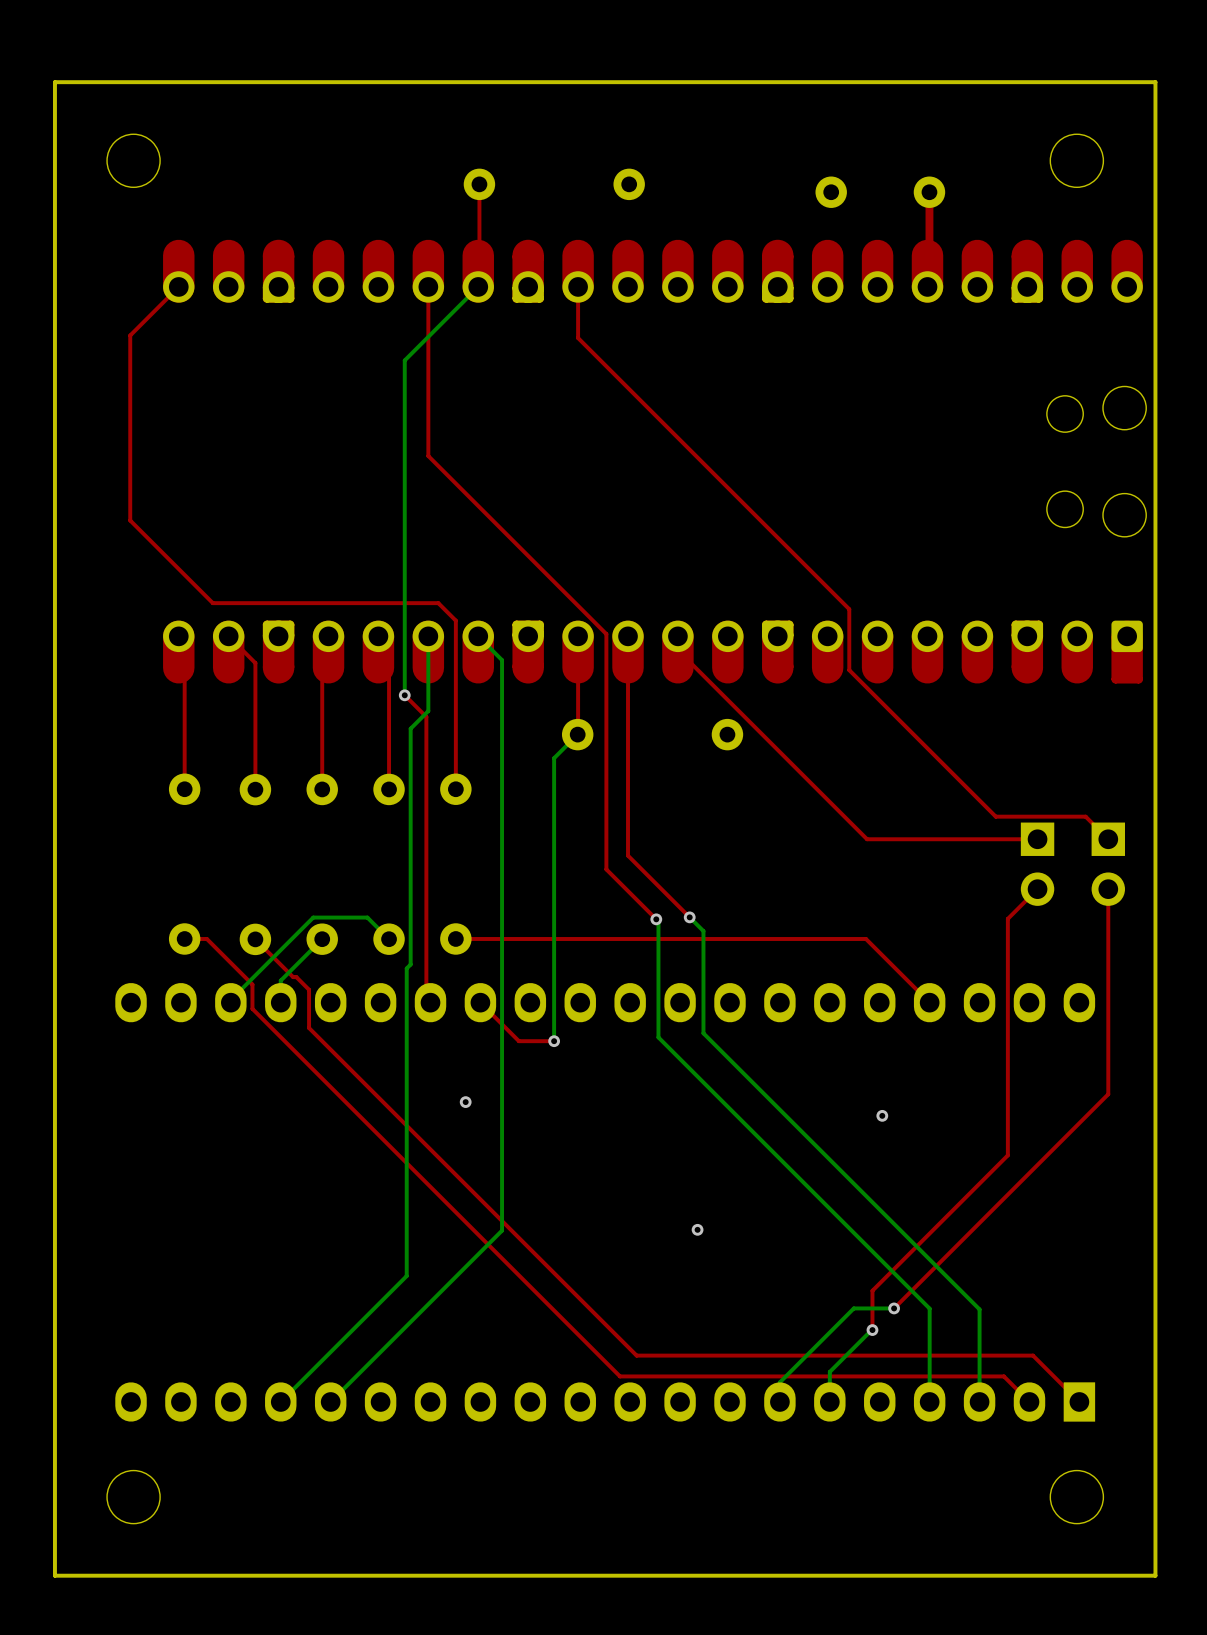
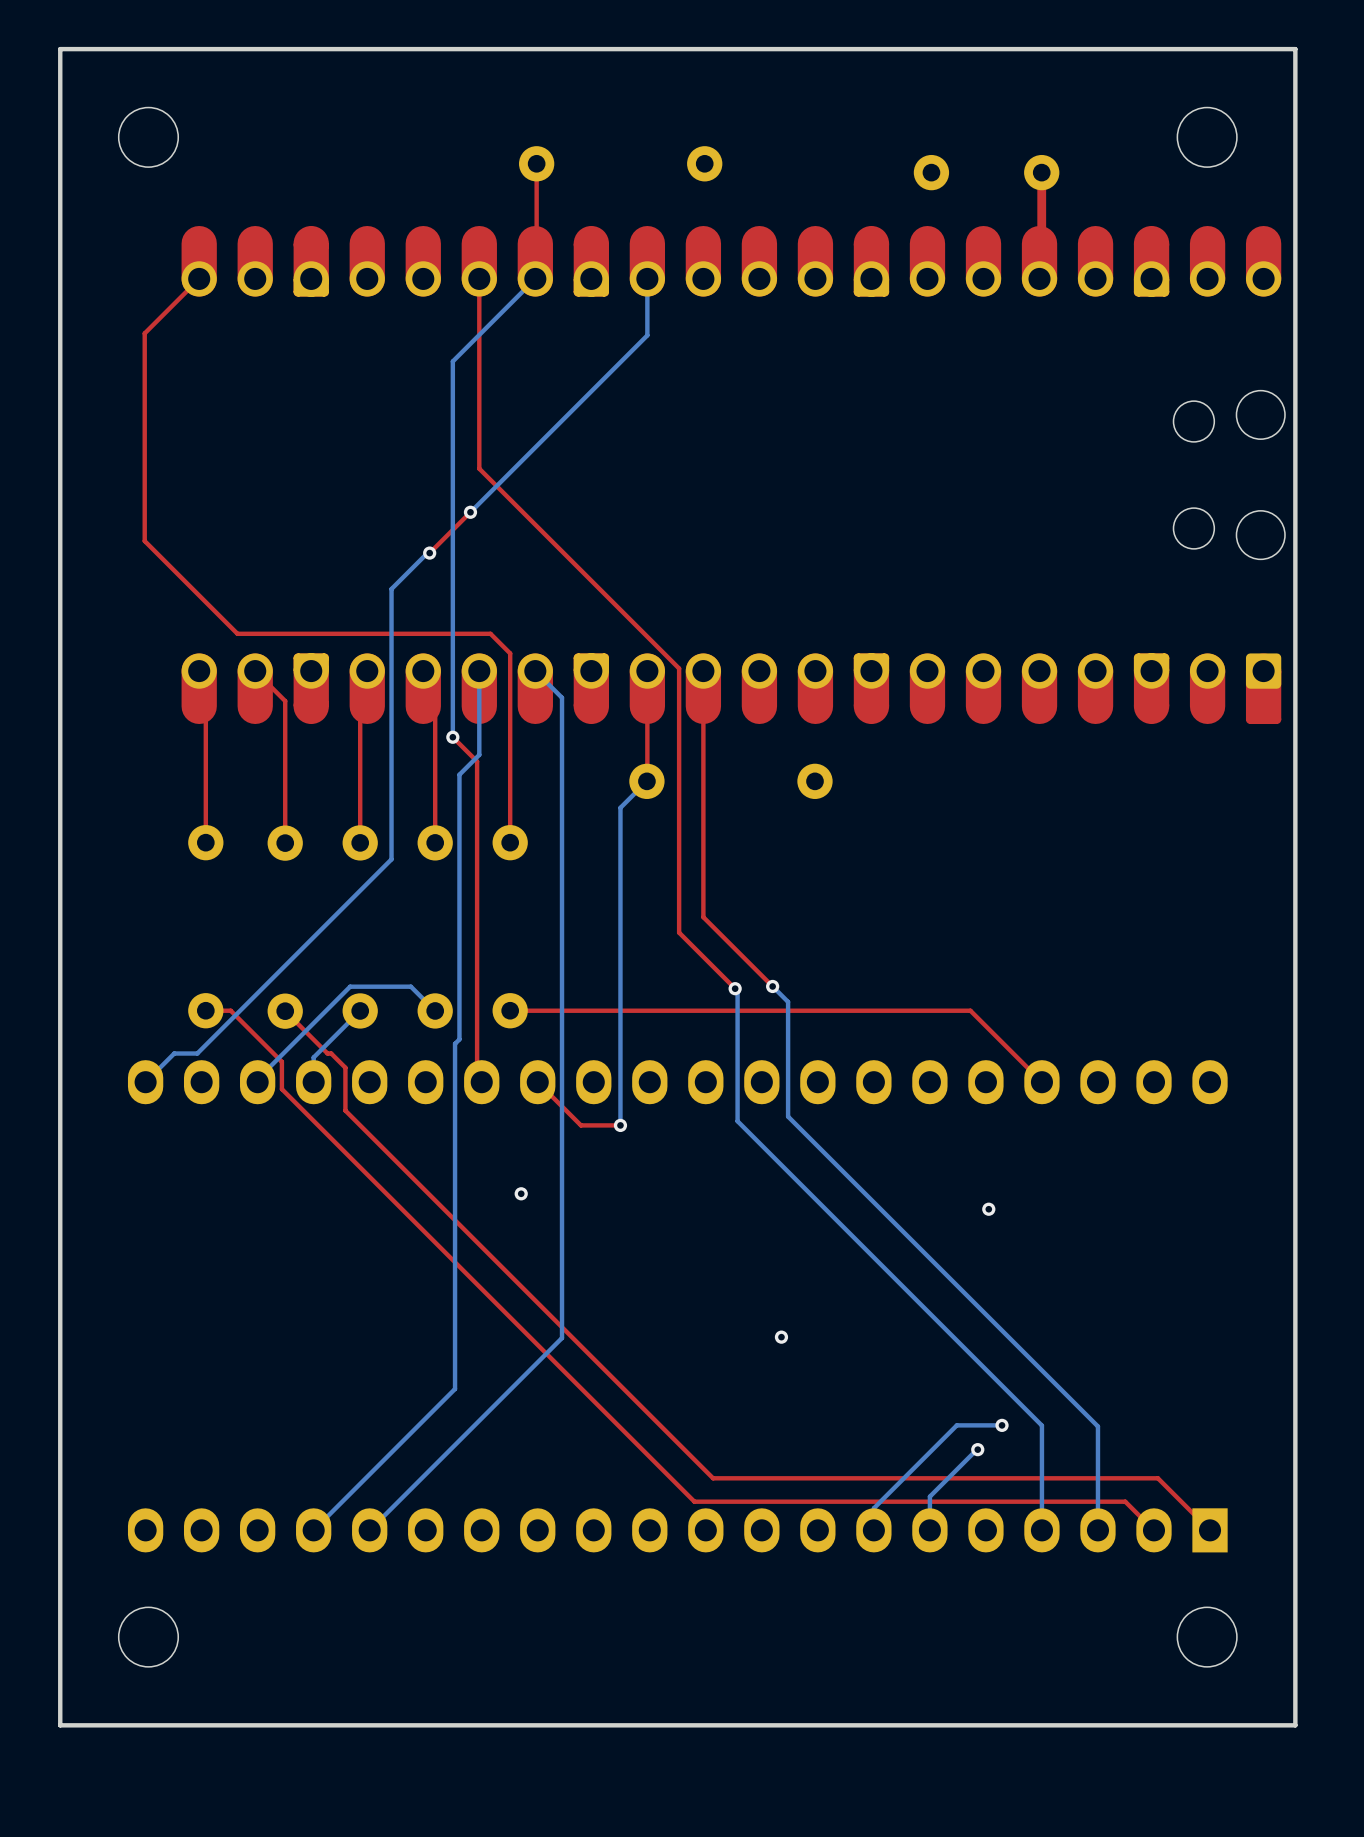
top track: (578, 286) (578, 338) (849, 609) (849, 670) (995, 816) (1085, 816) (1108, 839) -> none
bottom track: none -> (647, 278) (647, 335) (470, 512)
top track: none -> (470, 512) (429, 553)
via: none -> (470, 512)
bottom track: none -> (429, 553) (427, 553) (391, 589) (391, 859) (197, 1053) (174, 1053) (145, 1082)
via: none -> (429, 553)
top track: (677, 650) (867, 839) (1037, 839) -> none
part: (1037, 864) -> none
part: (1108, 864) -> none
top track: (1037, 889) (1007, 918) (1007, 1155) (872, 1290) (872, 1330) -> none
top track: (1108, 889) (1108, 1094) (894, 1308) -> none

